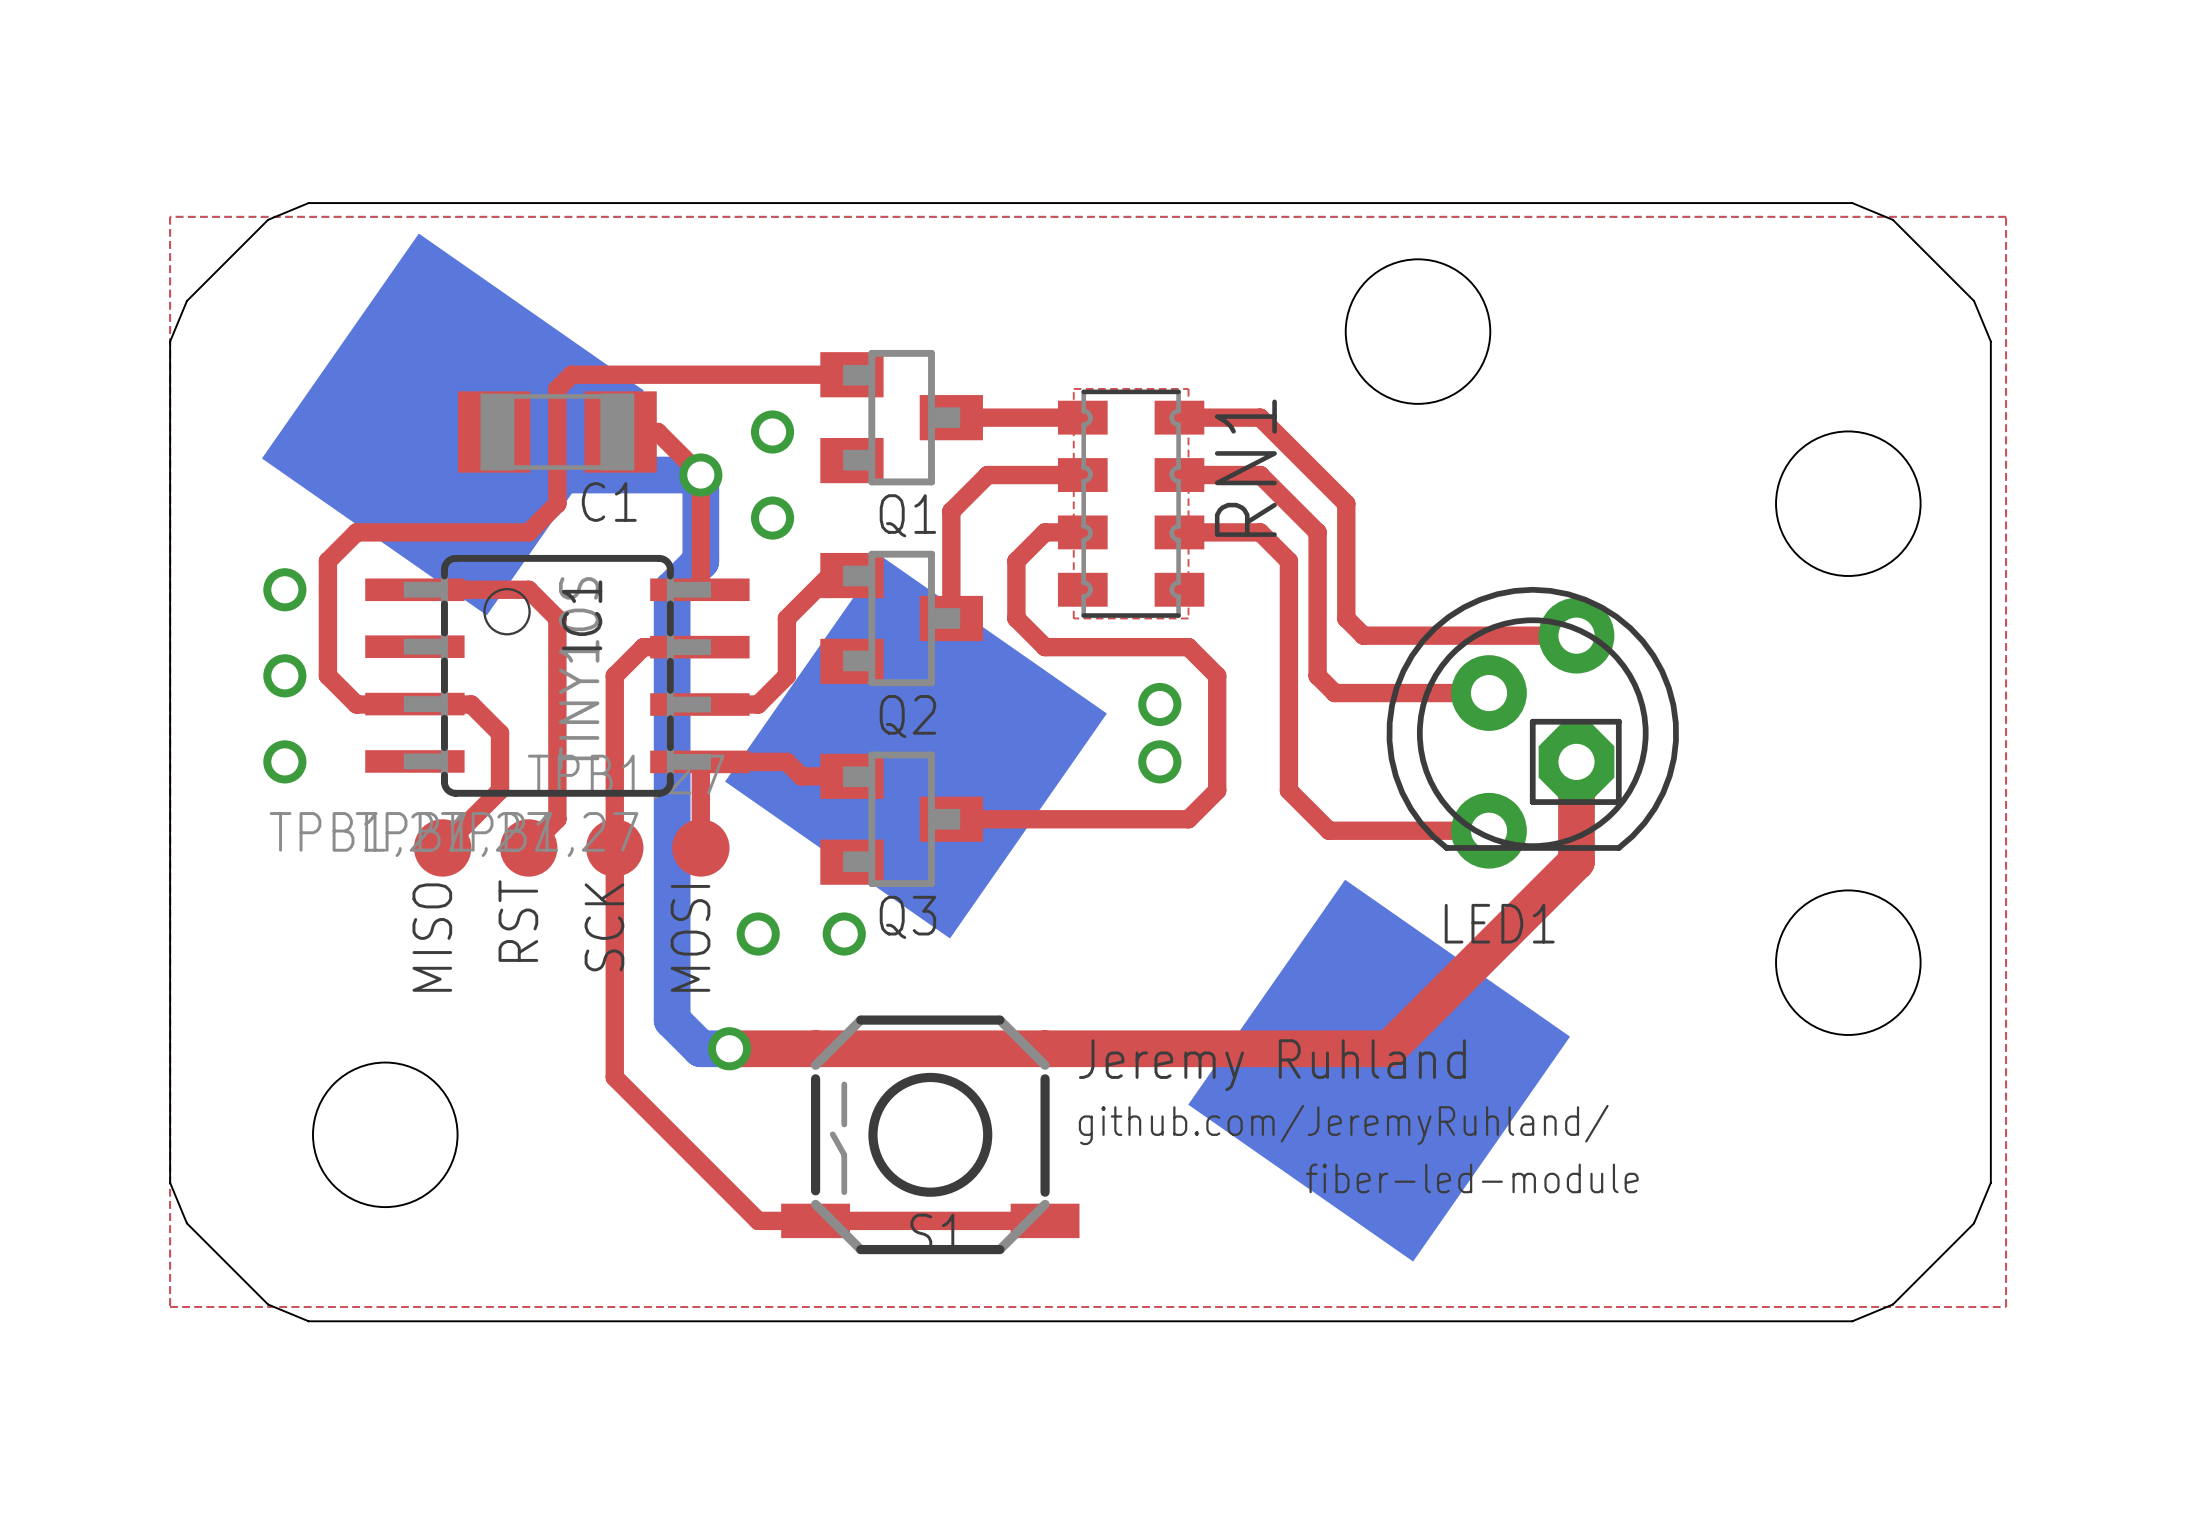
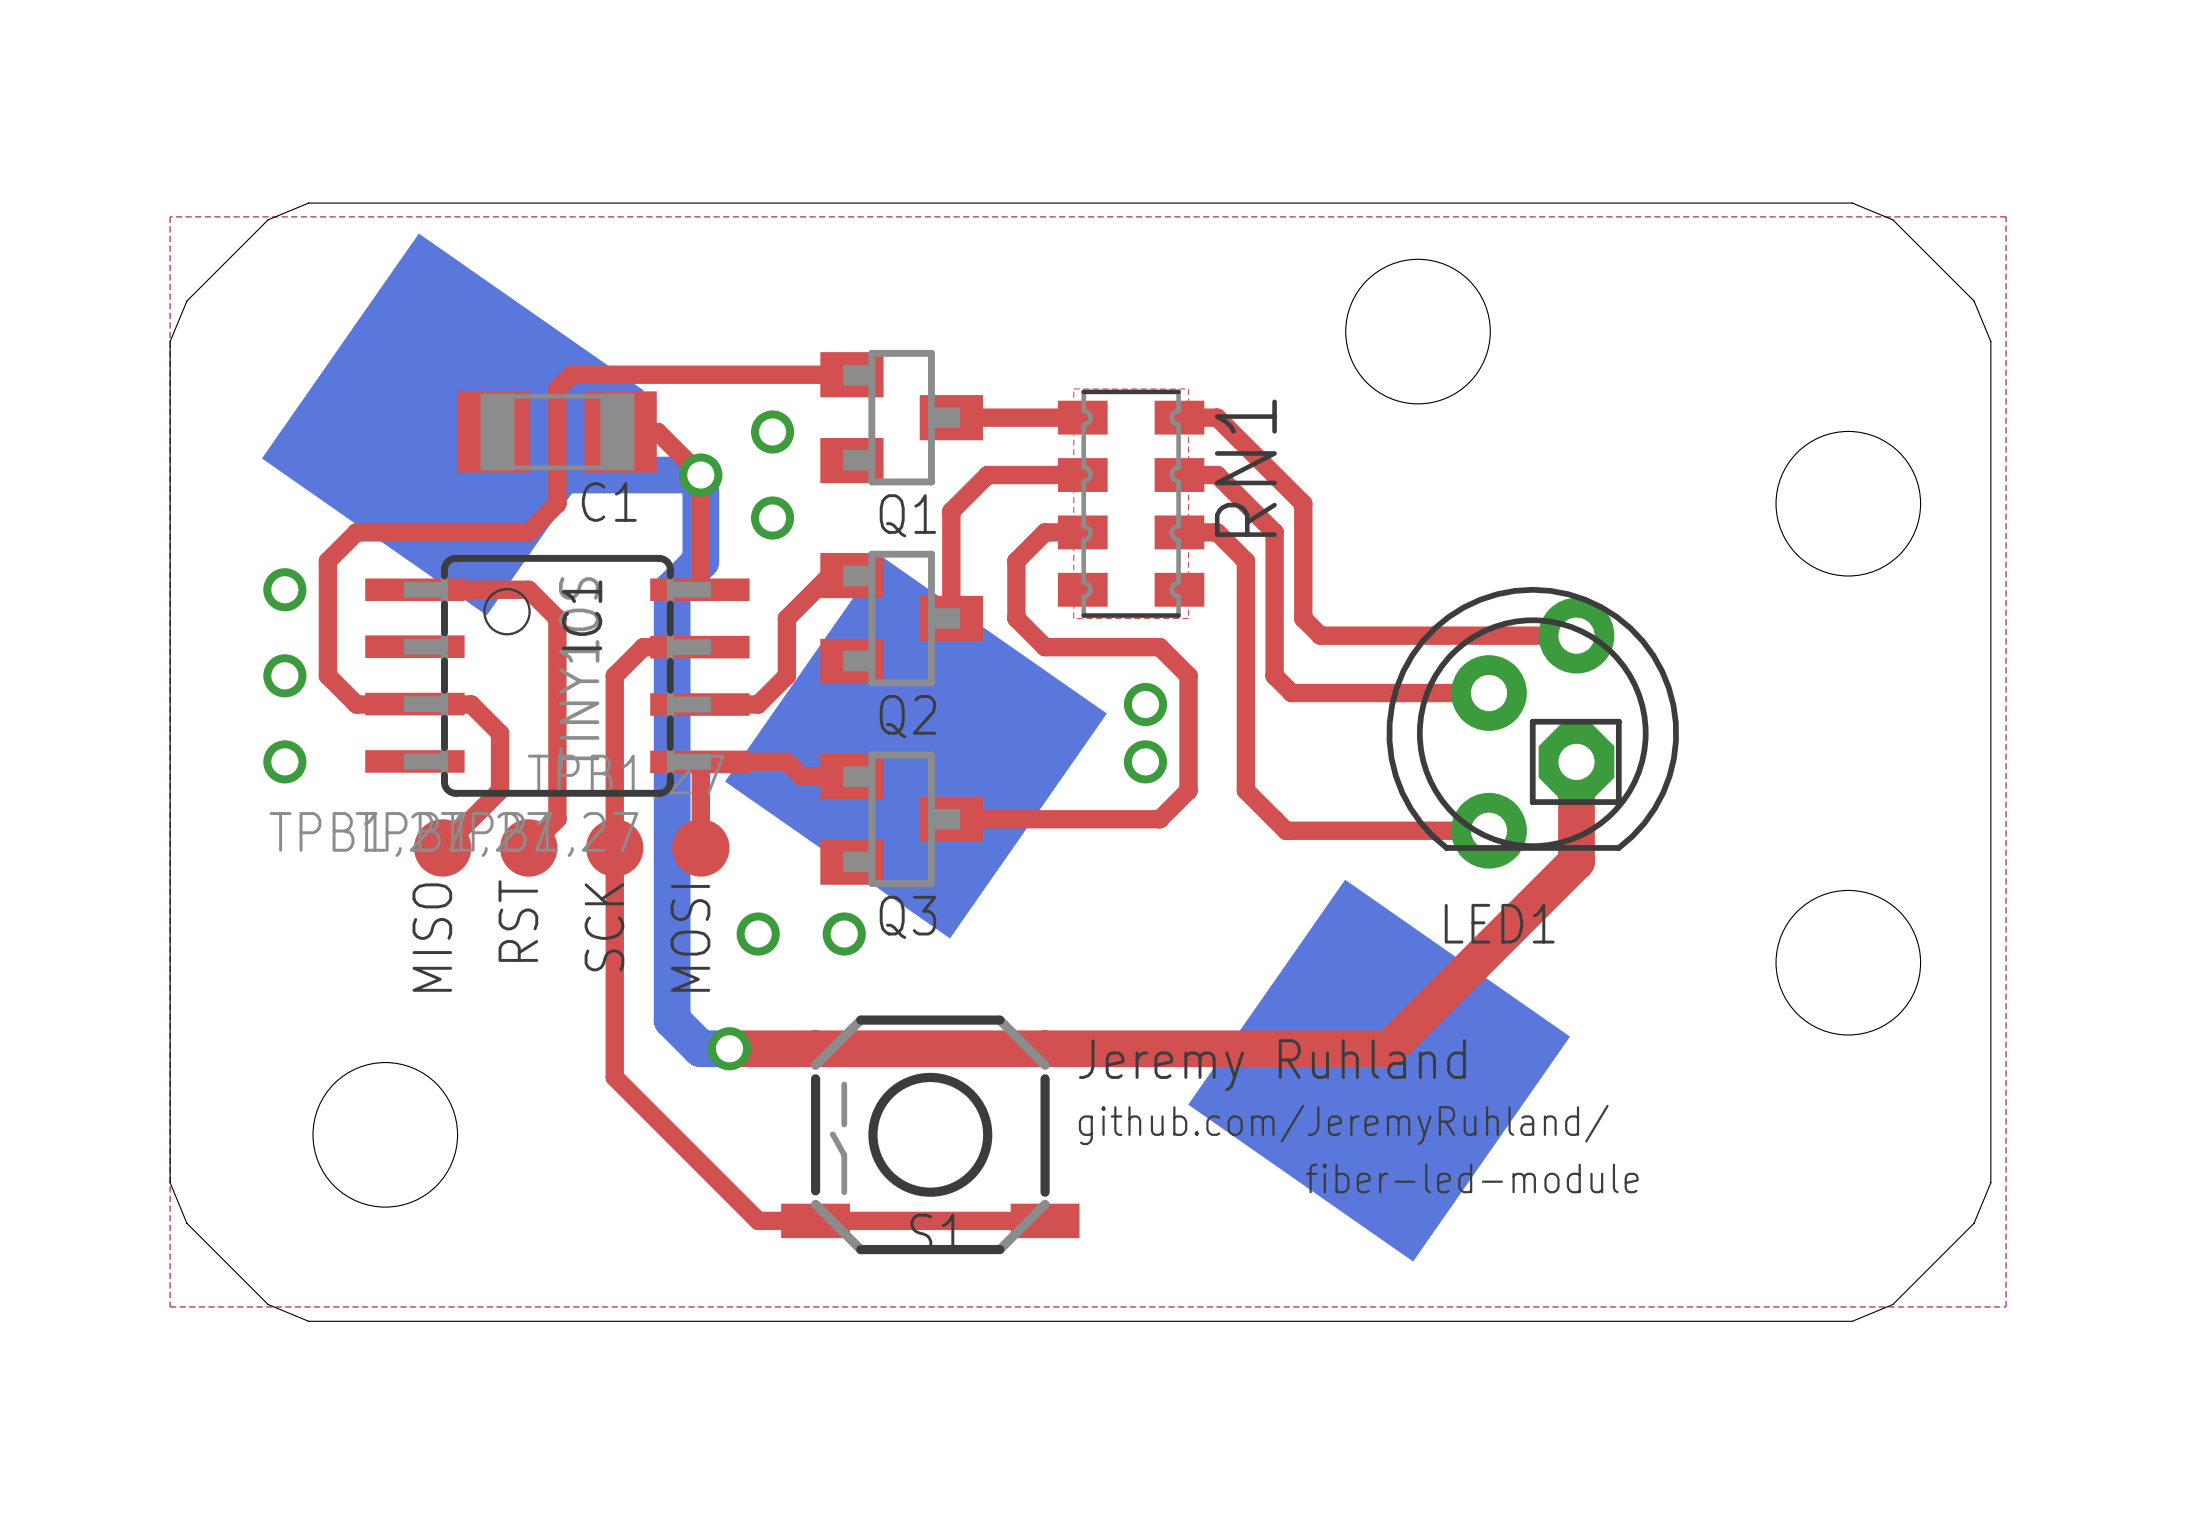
top track: (1217, 417) (1260, 417) (1346, 503) (1346, 618) (1363, 635) -> (1217, 417) (1303, 503) (1303, 618) (1320, 635) (1363, 635)
top track: (1217, 475) (1260, 475) (1317, 532) (1317, 675) (1334, 693) -> (1217, 475) (1274, 532) (1274, 675) (1291, 693) (1334, 693)
top track: (1217, 532) (1260, 532) (1288, 561) (1288, 790) (1329, 830) -> (1217, 532) (1245, 561) (1245, 790) (1286, 830) (1329, 830)
top track: (1159, 647) (1188, 647) (1217, 675) (1217, 790) (1188, 819) (1159, 819) -> (1159, 647) (1188, 675) (1188, 790) (1159, 819)
via position: (1159, 704) -> (1145, 704)
via position: (1159, 761) -> (1145, 761)

